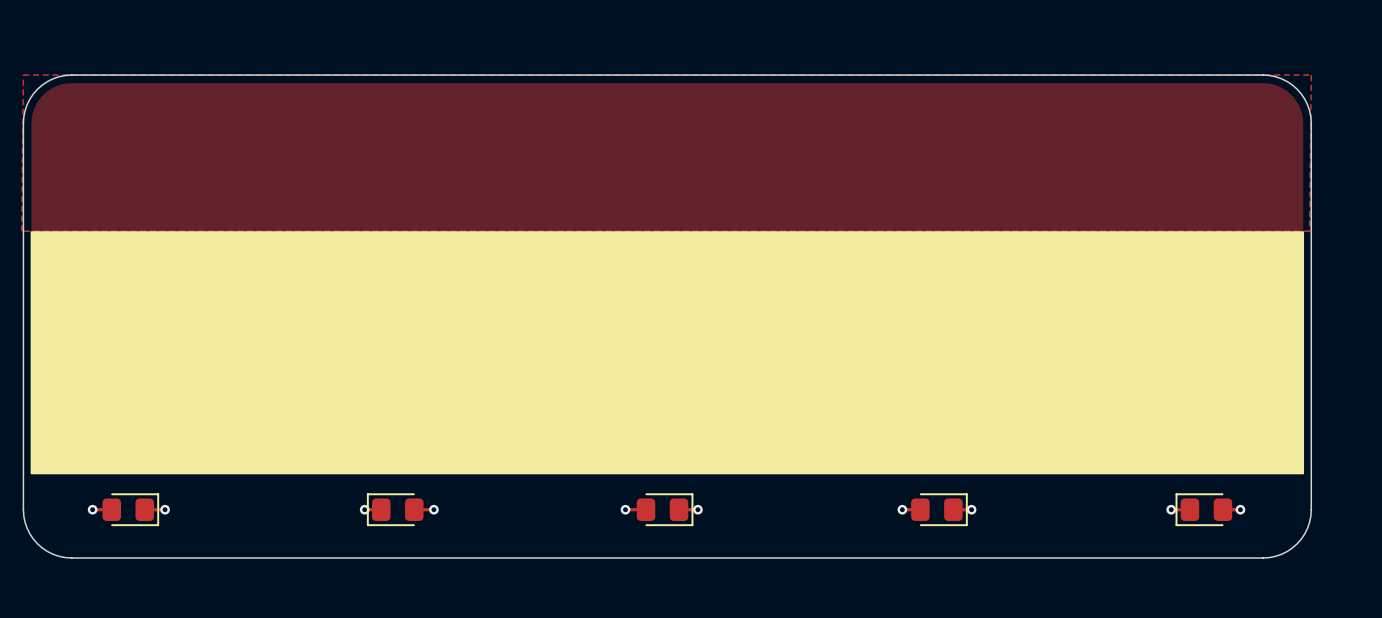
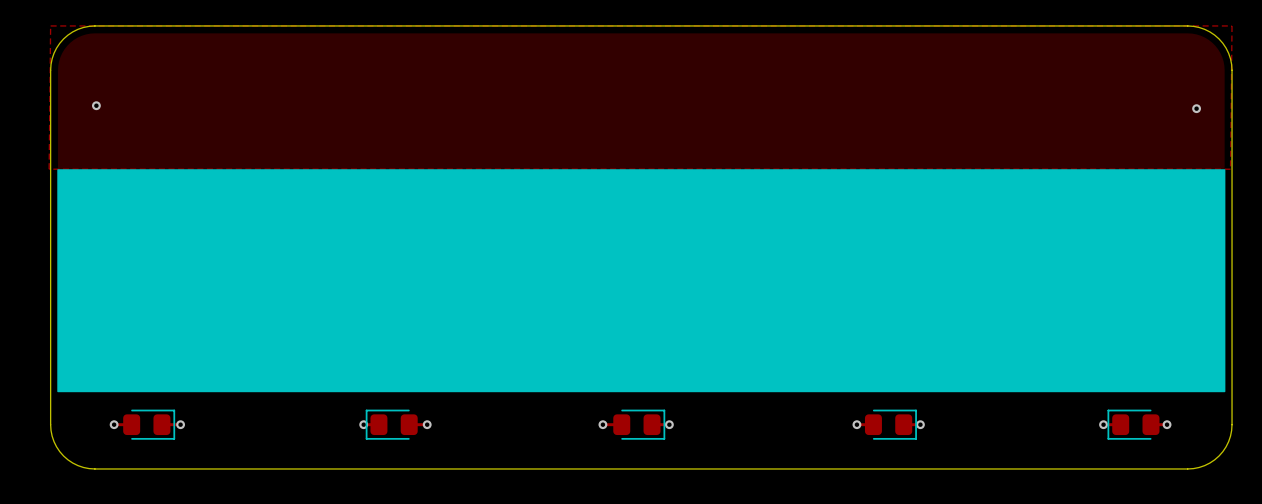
via: none -> (96, 105)
via: none -> (1196, 108)

